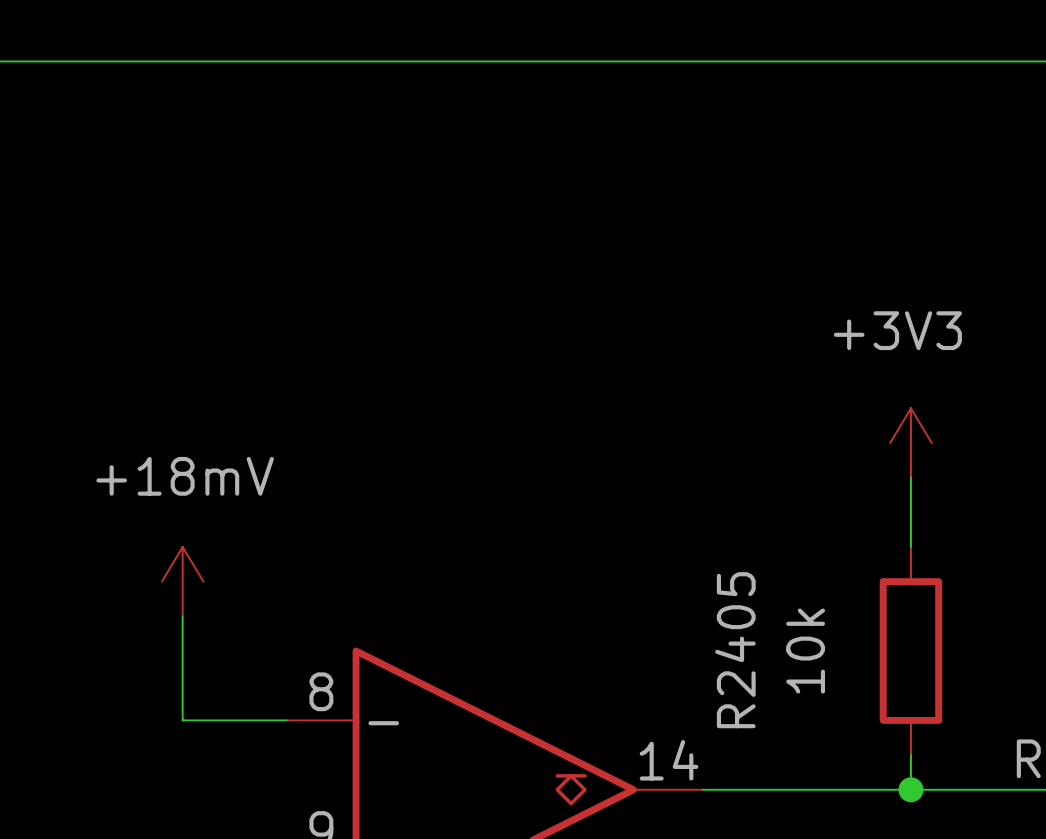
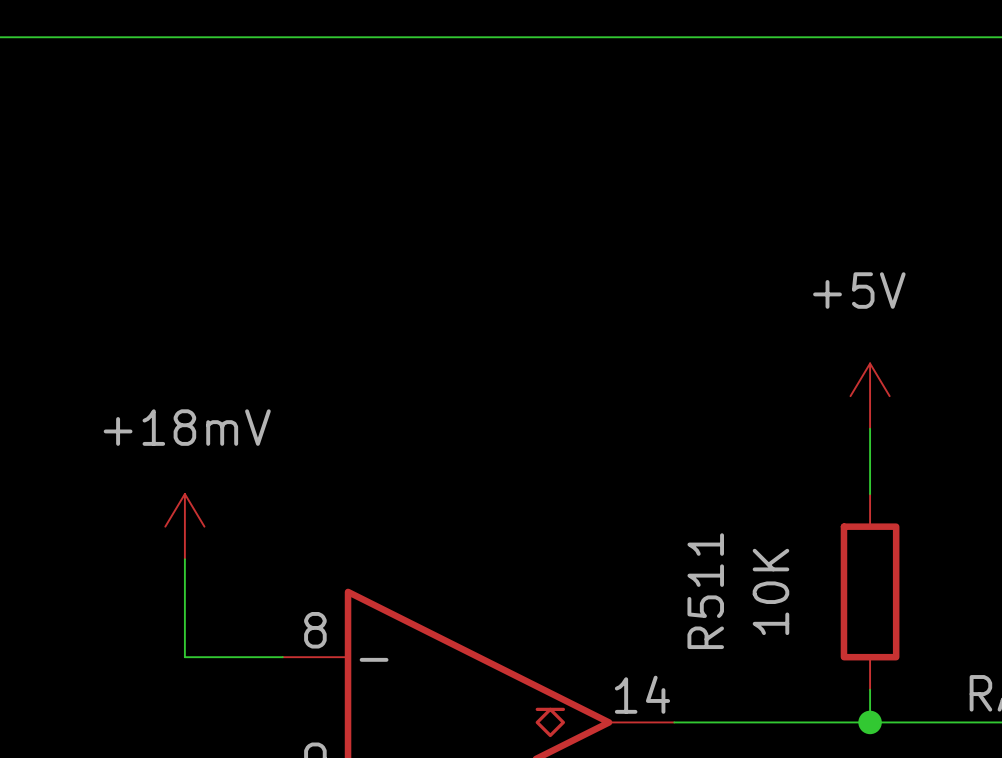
power symbol: +3V3 (910, 442) -> +5V (870, 396)
R2405 name: R2405 (735, 650) -> R511 (705, 591)
R2405 value: 10k (805, 651) -> 10K (770, 591)

